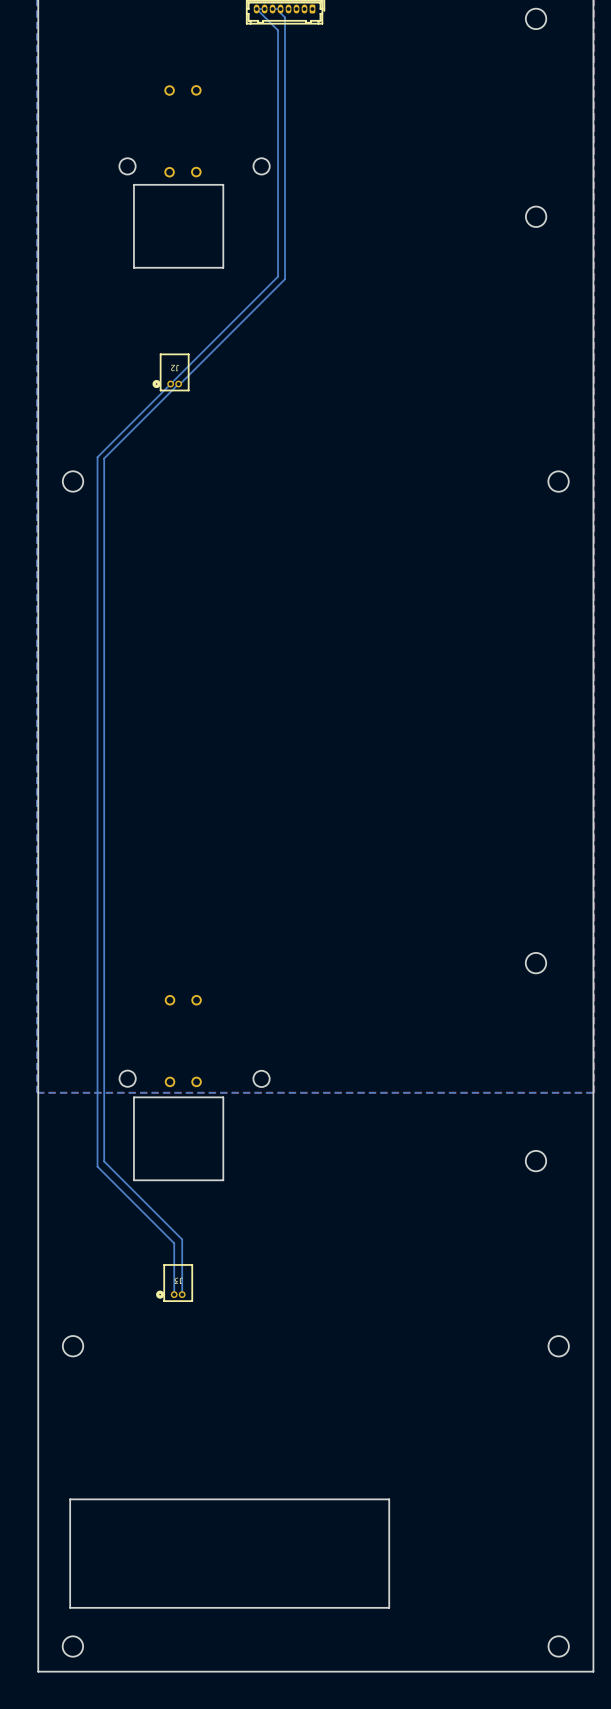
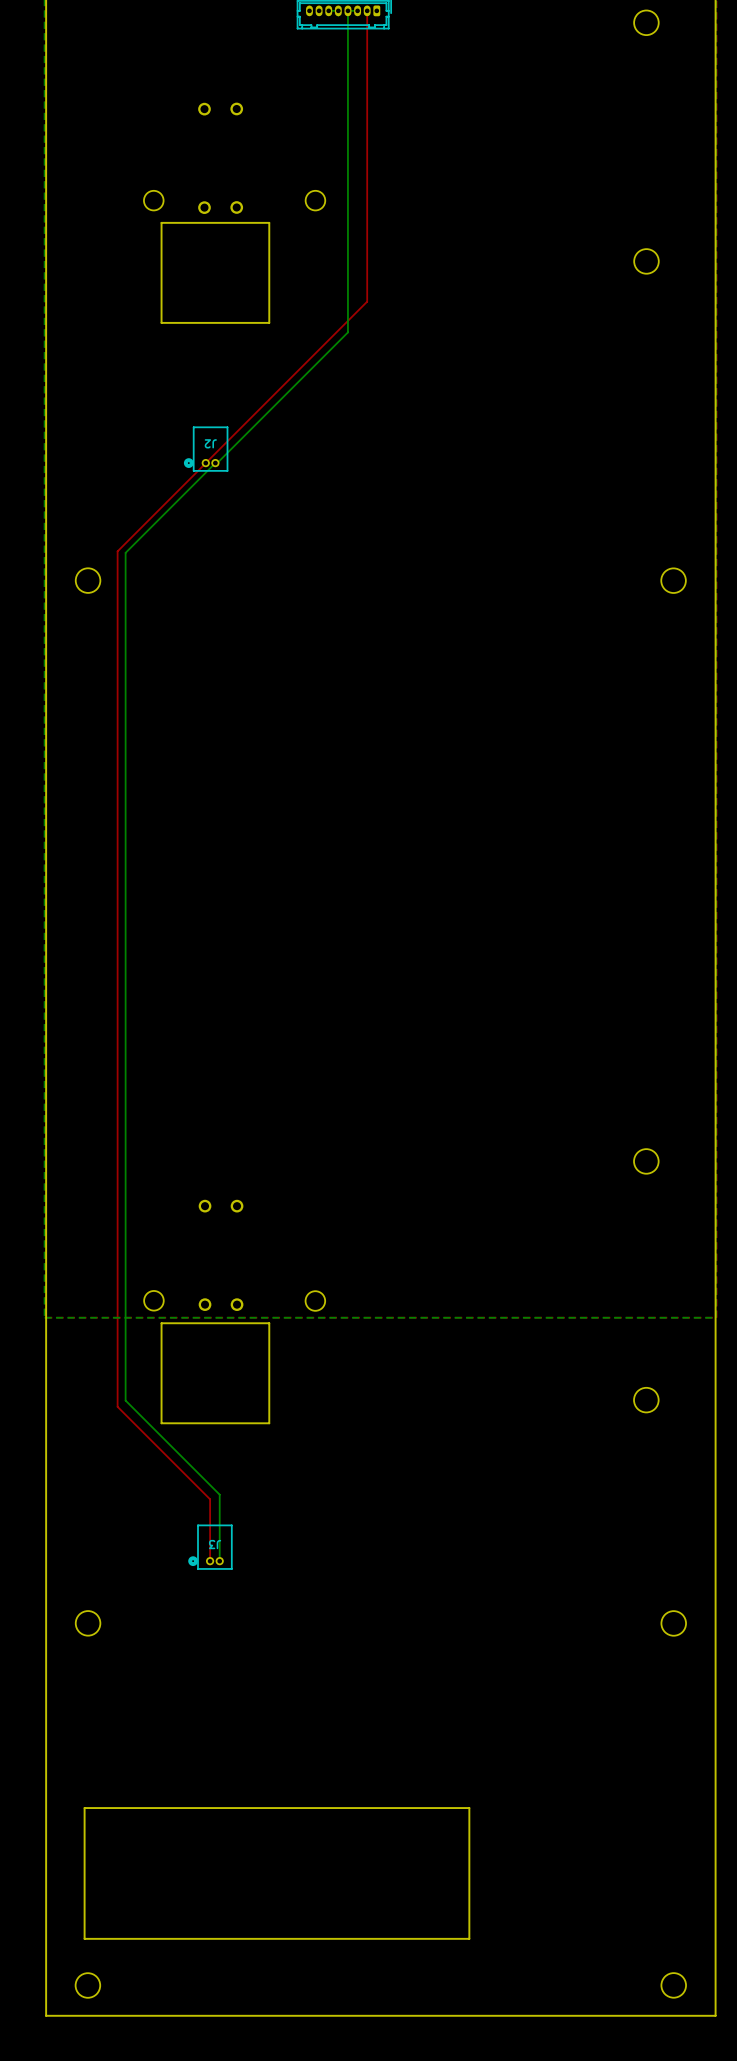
bottom track: (264, 9) (256, 9) (278, 30) (278, 276) (170, 384) -> none
top track: none -> (367, 10) (367, 301) (205, 463)
bottom track: (280, 13) (285, 17) (285, 279) -> (357, 10) (347, 10) (347, 332) (343, 336)
bottom track: (170, 384) (97, 457) (97, 1166) (174, 1243) (174, 1294) -> none
top track: none -> (205, 463) (117, 551) (117, 1406) (210, 1499) (210, 1561)

